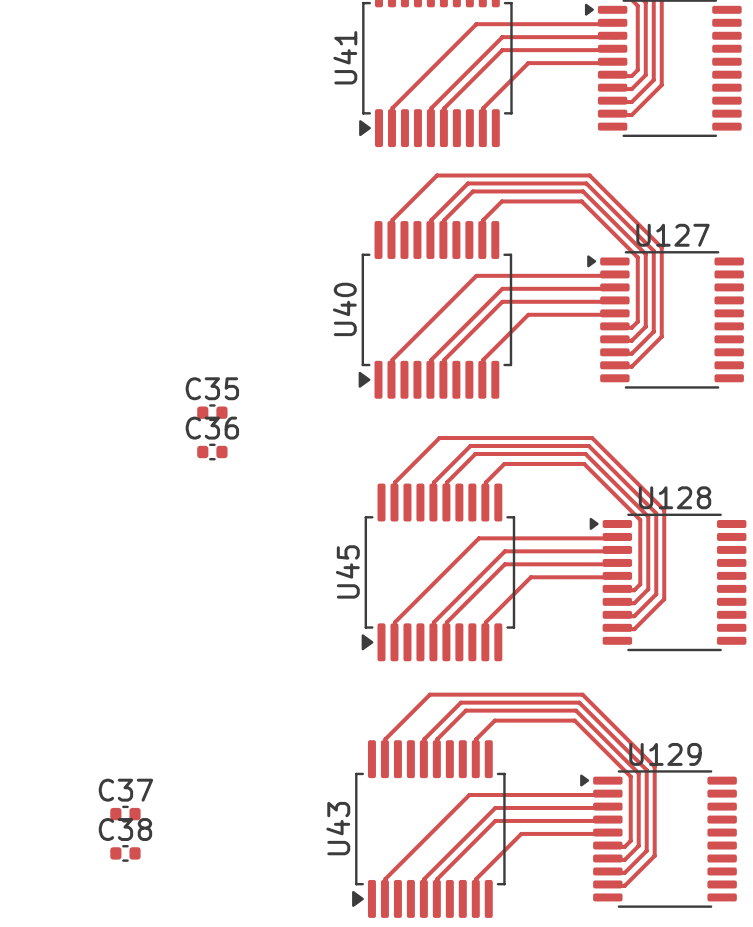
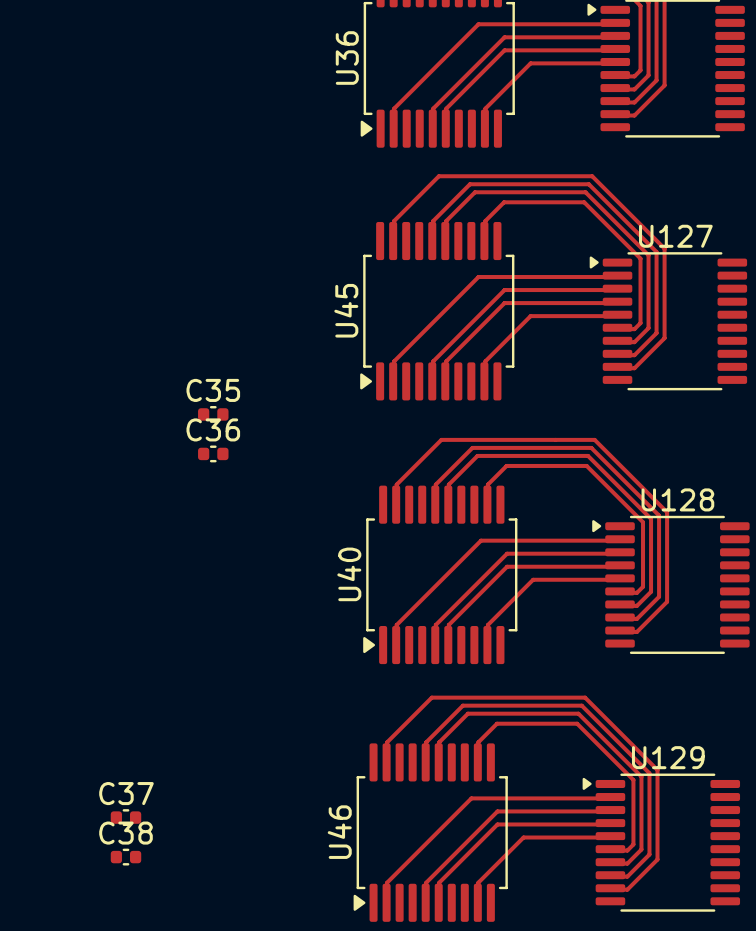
U41 name: U41 (345, 57) -> U36 (347, 58)
U40 name: U40 (344, 309) -> U45 (346, 310)
U45 name: U45 (347, 571) -> U40 (349, 574)
U43 name: U43 (338, 828) -> U46 (339, 832)

